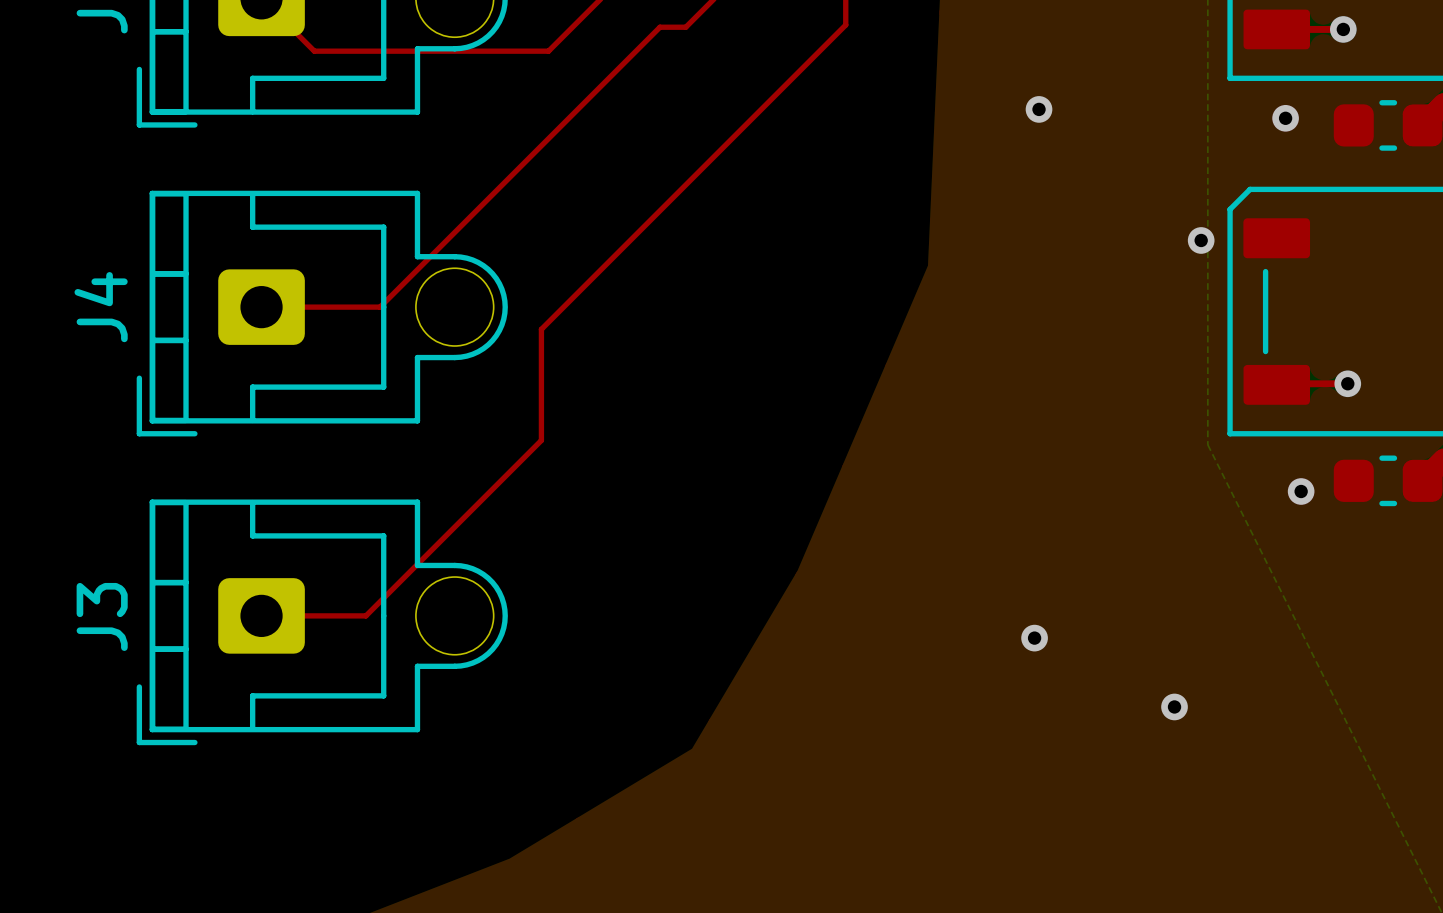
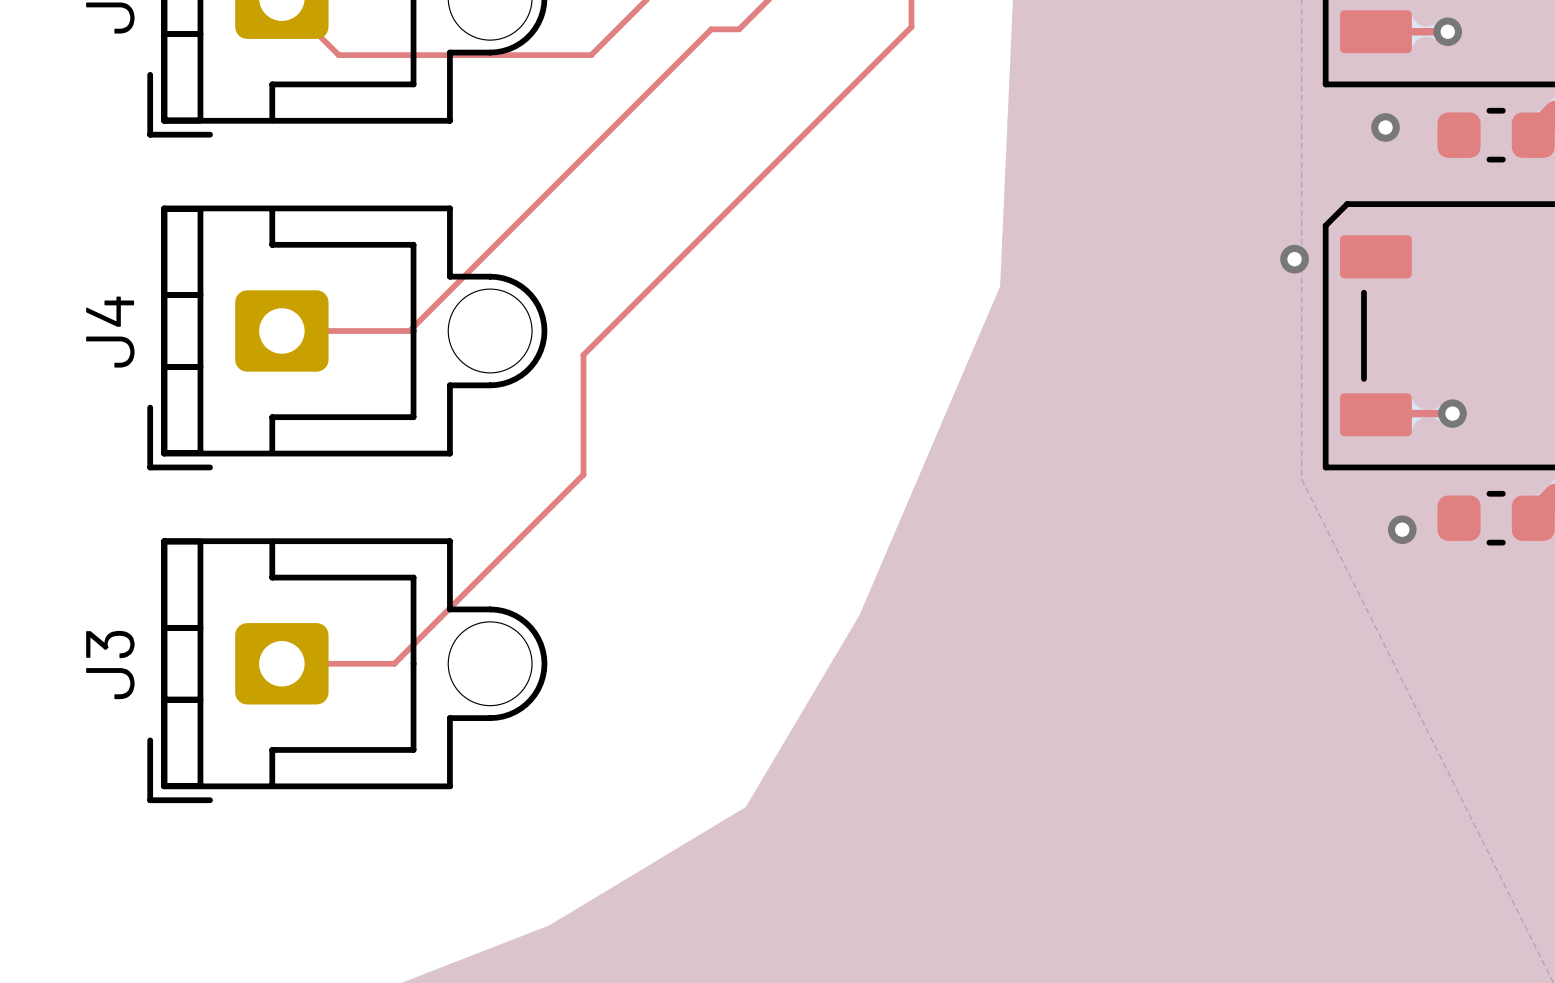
via: (1039, 109) -> none
via: (1034, 638) -> none
via: (1174, 706) -> none

